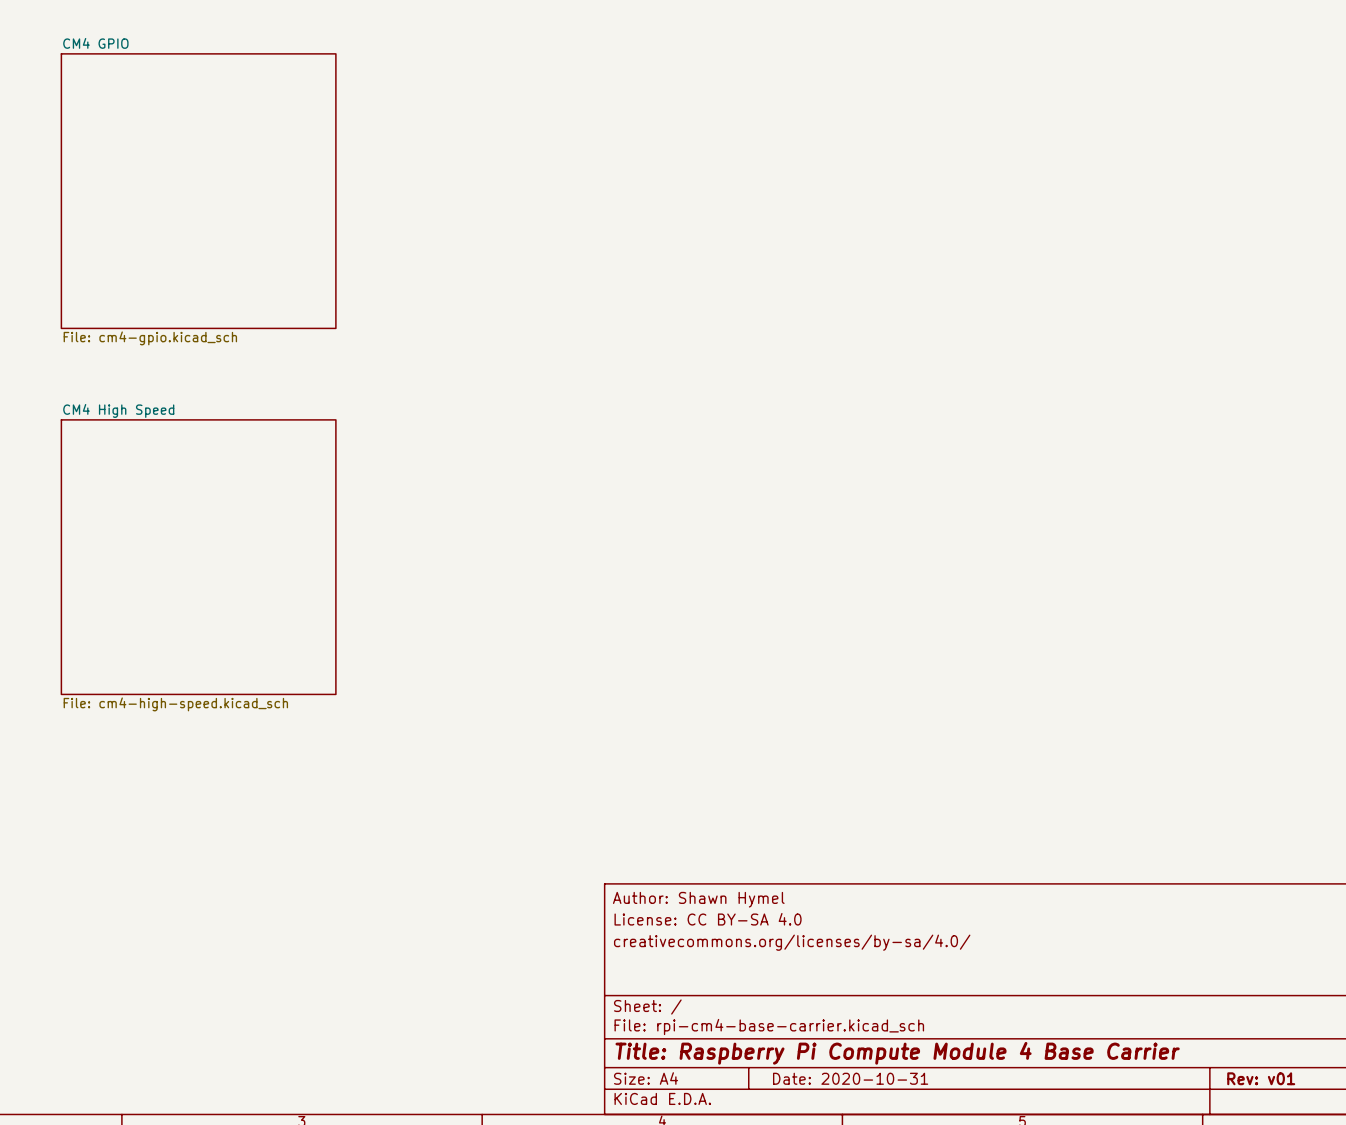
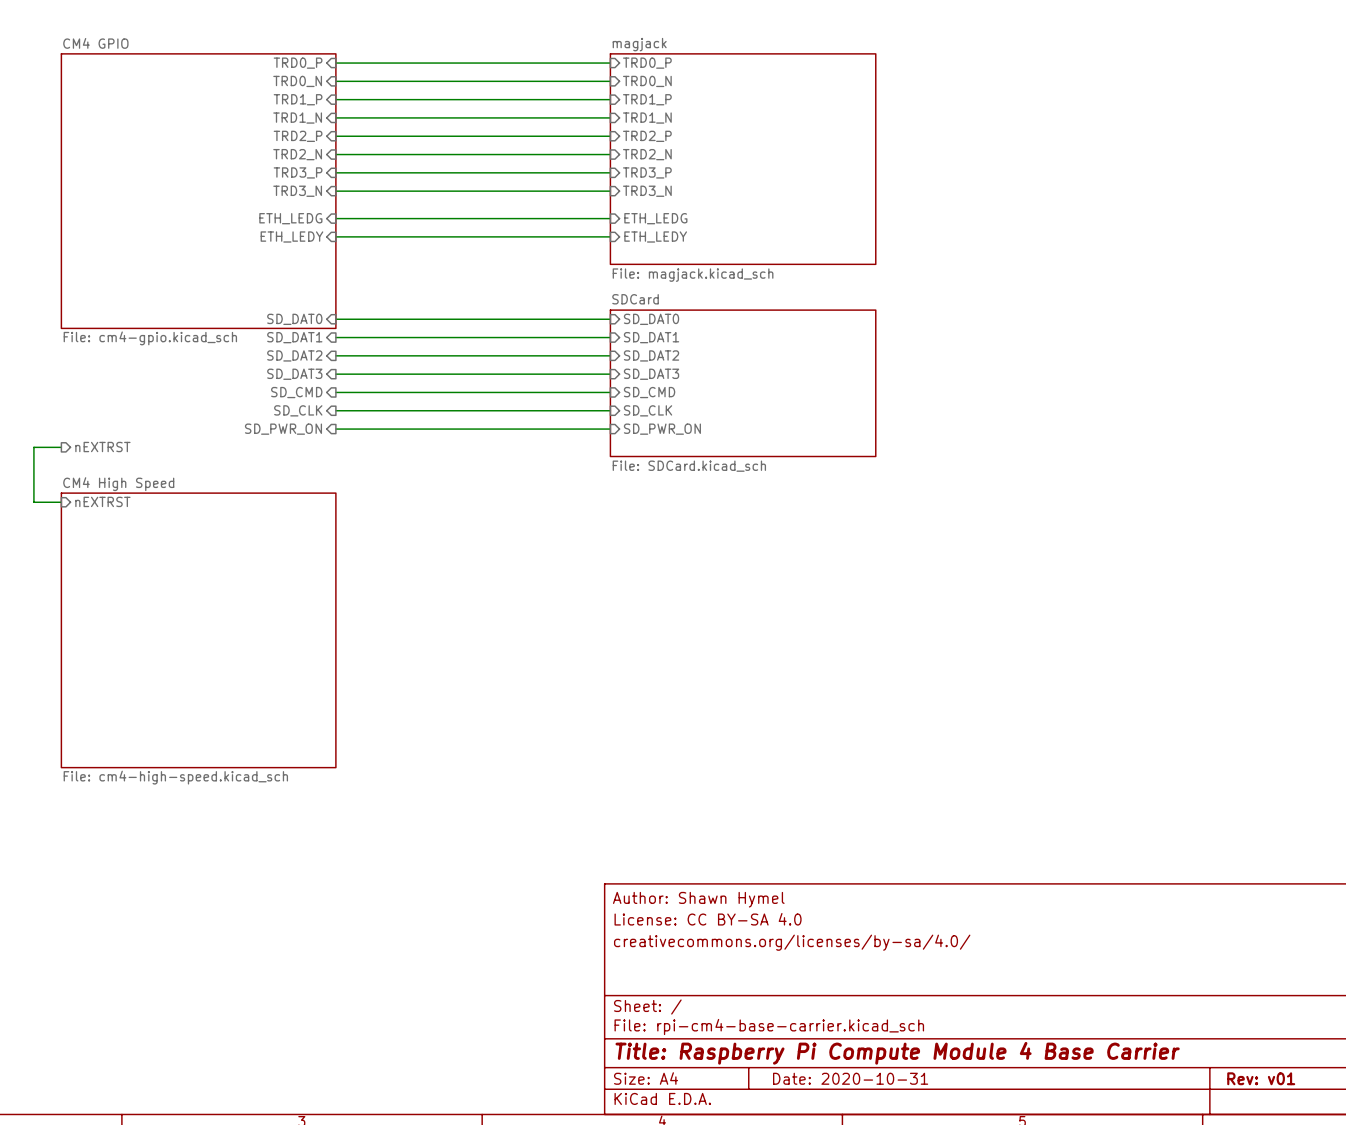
sheet pin: none -> TRD0_P (298, 63)
wire: none -> (335, 63) (610, 63)
sheet pin: none -> TRD0_P (647, 63)
sheet pin: none -> TRD0_N (297, 81)
wire: none -> (335, 81) (610, 81)
sheet pin: none -> TRD0_N (647, 81)
sheet pin: none -> TRD1_P (298, 99)
wire: none -> (335, 99) (610, 99)
sheet pin: none -> TRD1_P (647, 99)
wire: none -> (335, 117) (610, 117)
sheet pin: none -> TRD1_N (297, 118)
sheet pin: none -> TRD1_N (647, 118)
sheet pin: none -> TRD2_P (298, 136)
wire: none -> (335, 136) (610, 136)
sheet pin: none -> TRD2_P (647, 136)
sheet pin: none -> TRD2_N (297, 154)
wire: none -> (335, 154) (610, 154)
sheet pin: none -> TRD2_N (647, 154)
sheet magjack: none -> File: magjack.kicad_sch (743, 159)
sheet pin: none -> TRD3_P (298, 172)
wire: none -> (335, 172) (610, 172)
sheet pin: none -> TRD3_P (647, 172)
sheet pin: none -> TRD3_N (297, 191)
wire: none -> (335, 191) (610, 191)
sheet pin: none -> TRD3_N (647, 191)
sheet pin: none -> ETH_LEDG (290, 218)
wire: none -> (335, 218) (610, 218)
sheet pin: none -> ETH_LEDG (655, 218)
sheet pin: none -> ETH_LEDY (291, 236)
wire: none -> (335, 236) (610, 236)
sheet pin: none -> ETH_LEDY (655, 236)
sheet pin: none -> SD_DAT0 (294, 319)
wire: none -> (335, 319) (610, 319)
sheet pin: none -> SD_DAT0 (651, 319)
sheet pin: none -> SD_DAT1 (294, 337)
wire: none -> (335, 337) (610, 337)
sheet pin: none -> SD_DAT1 (651, 337)
sheet pin: none -> SD_DAT2 (294, 355)
wire: none -> (335, 355) (610, 355)
sheet pin: none -> SD_DAT2 (651, 355)
sheet pin: none -> SD_DAT3 (294, 374)
wire: none -> (335, 374) (610, 374)
sheet pin: none -> SD_DAT3 (651, 374)
sheet SDCard: none -> File: SDCard.kicad_sch (743, 383)
sheet pin: none -> SD_CMD (296, 392)
wire: none -> (335, 392) (610, 392)
sheet pin: none -> SD_CMD (649, 392)
sheet pin: none -> SD_CLK (298, 410)
wire: none -> (335, 410) (610, 410)
sheet pin: none -> SD_CLK (648, 410)
sheet pin: none -> SD_PWR_ON (283, 429)
wire: none -> (335, 429) (610, 429)
sheet pin: none -> SD_PWR_ON (662, 429)
wire: none -> (61, 447) (33, 447) (33, 502) (61, 502)
sheet pin: none -> nEXTRST (102, 447)
sheet pin: none -> nEXTRST (102, 501)
sheet CM4 High Speed position: (198, 557) -> (198, 630)

